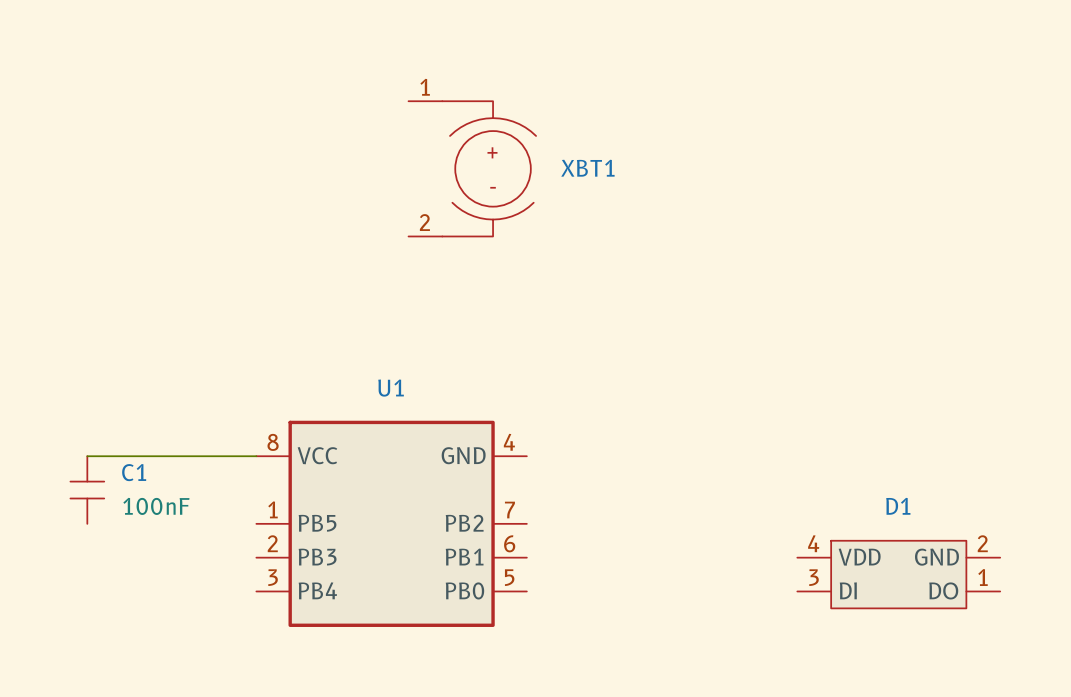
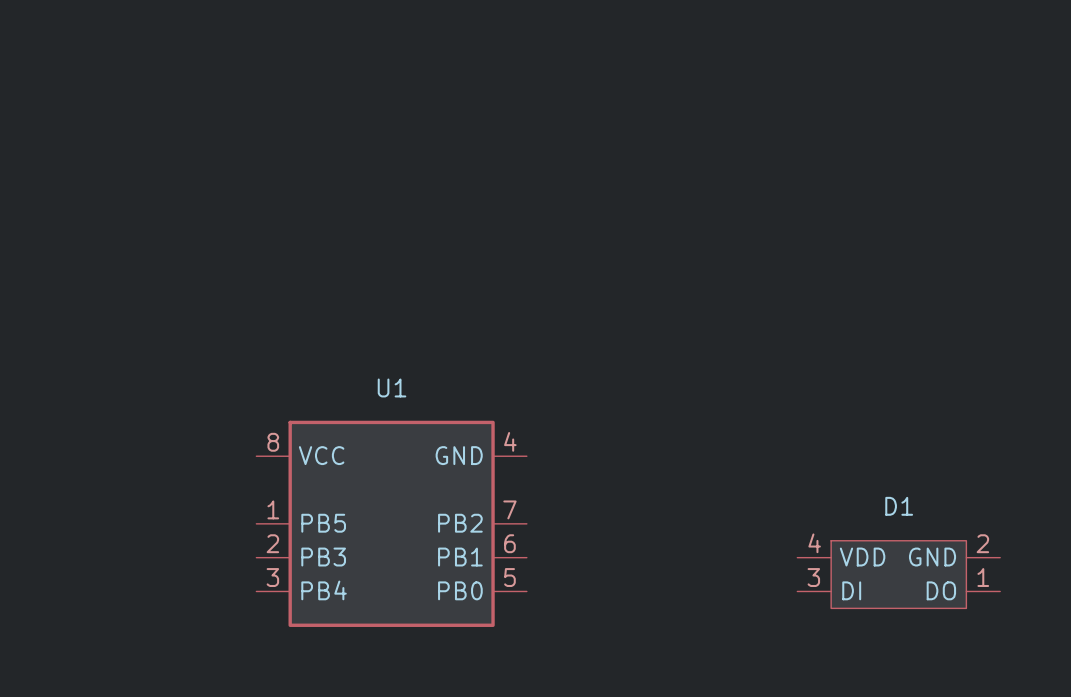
XBT1: (472, 168) -> none
wire: (87, 456) (256, 456) -> none
C1: 100nF (87, 490) -> none

